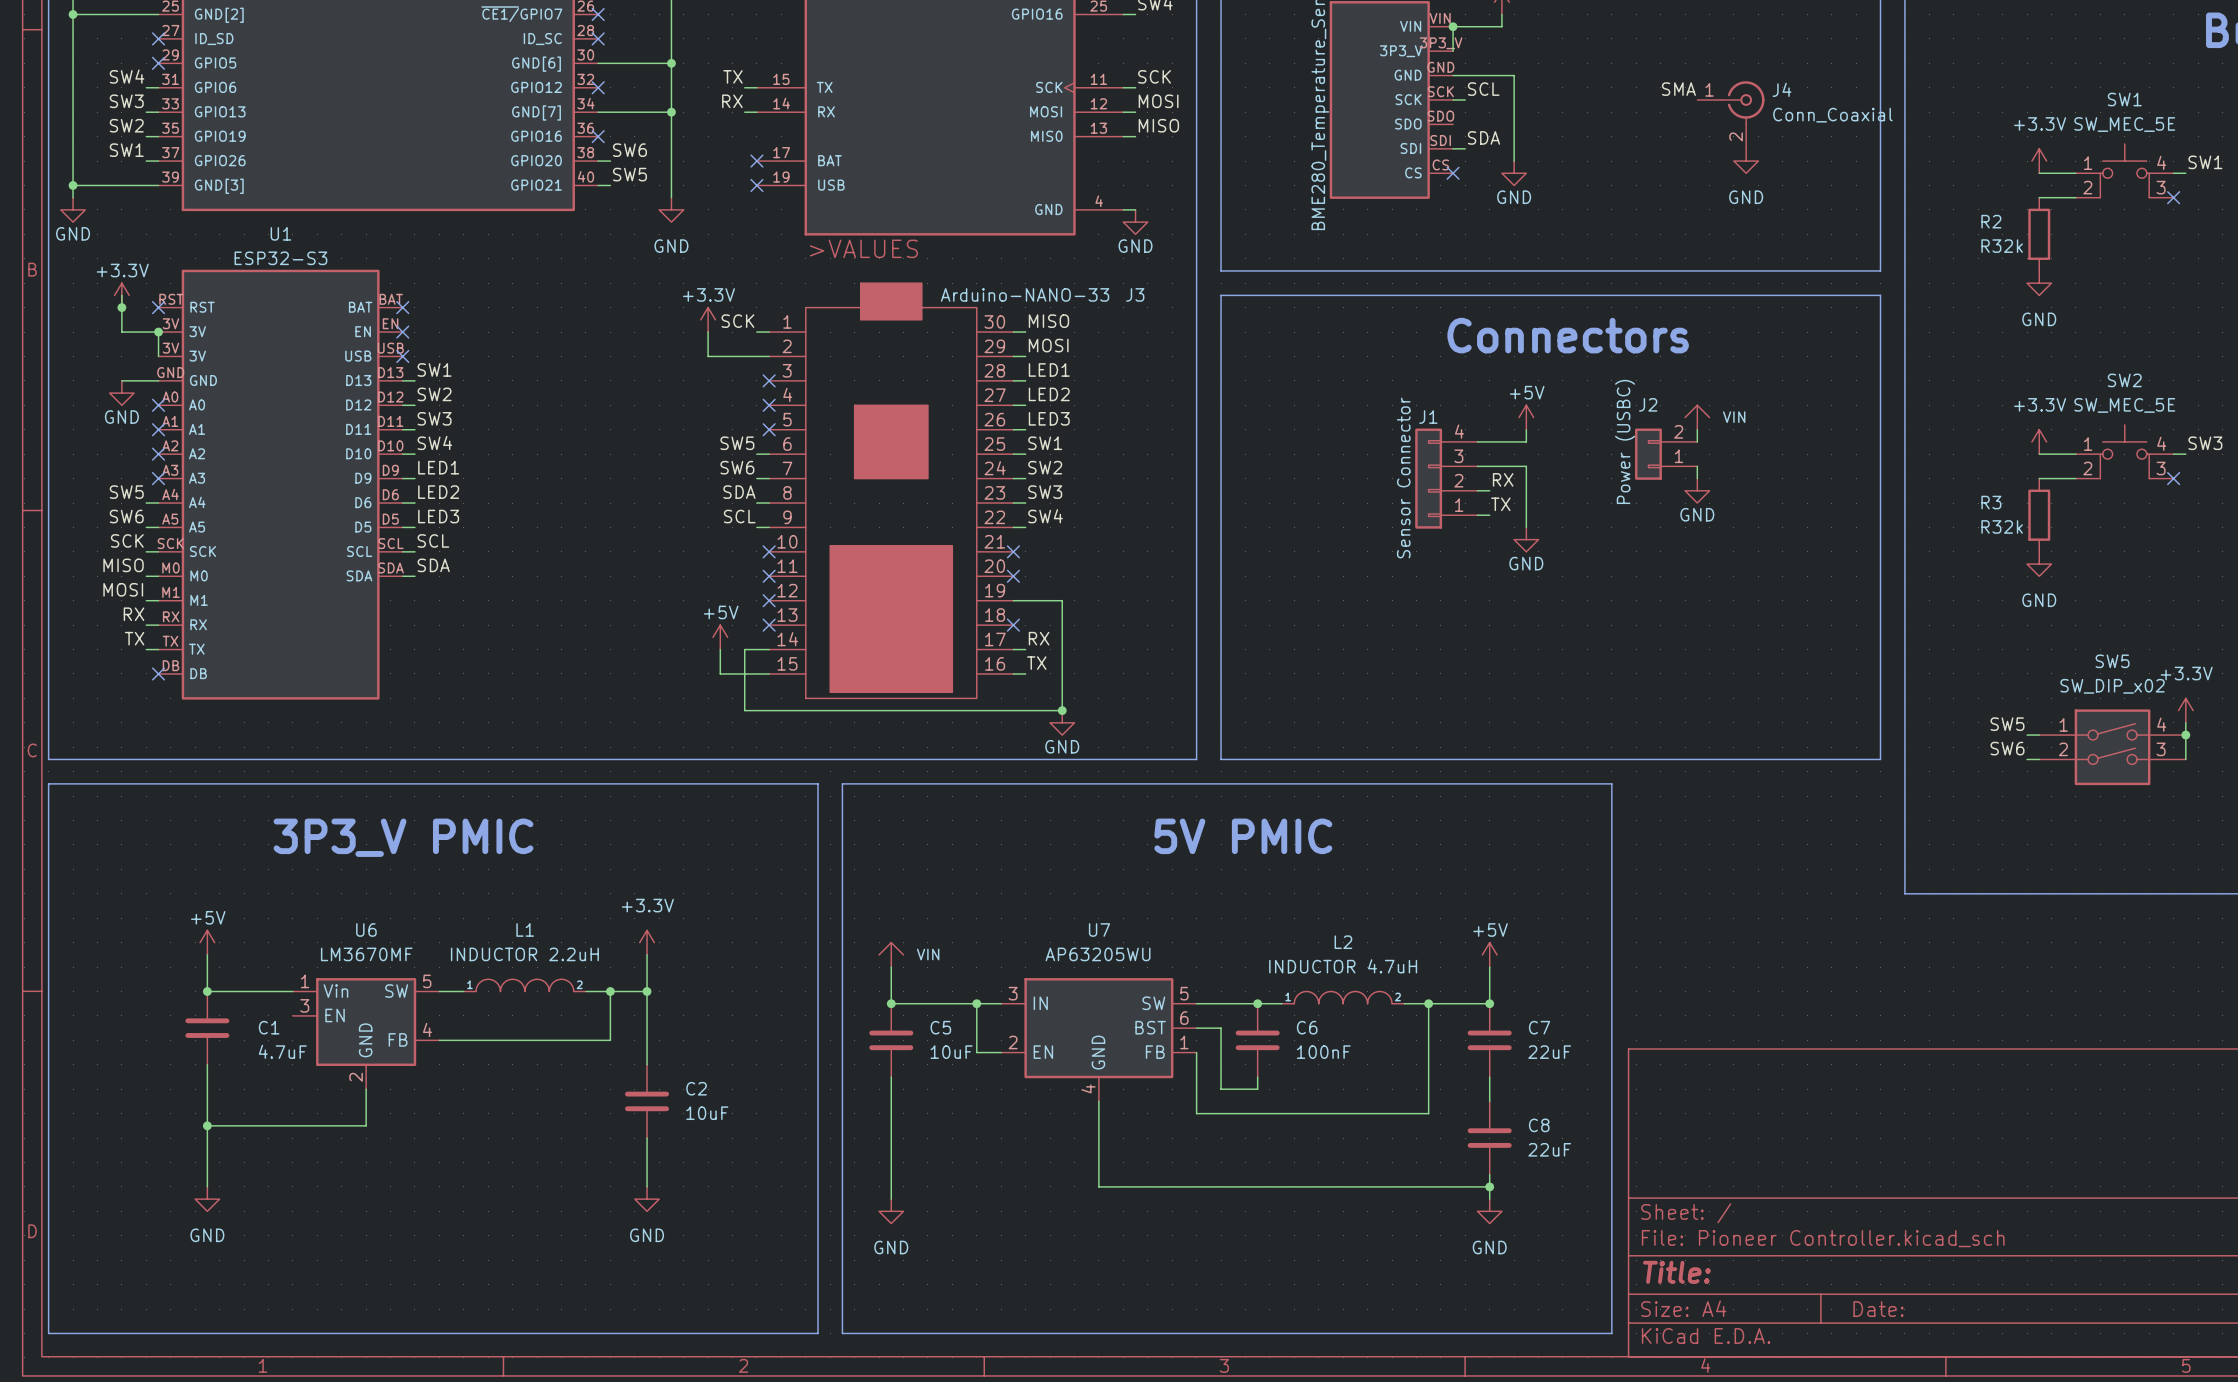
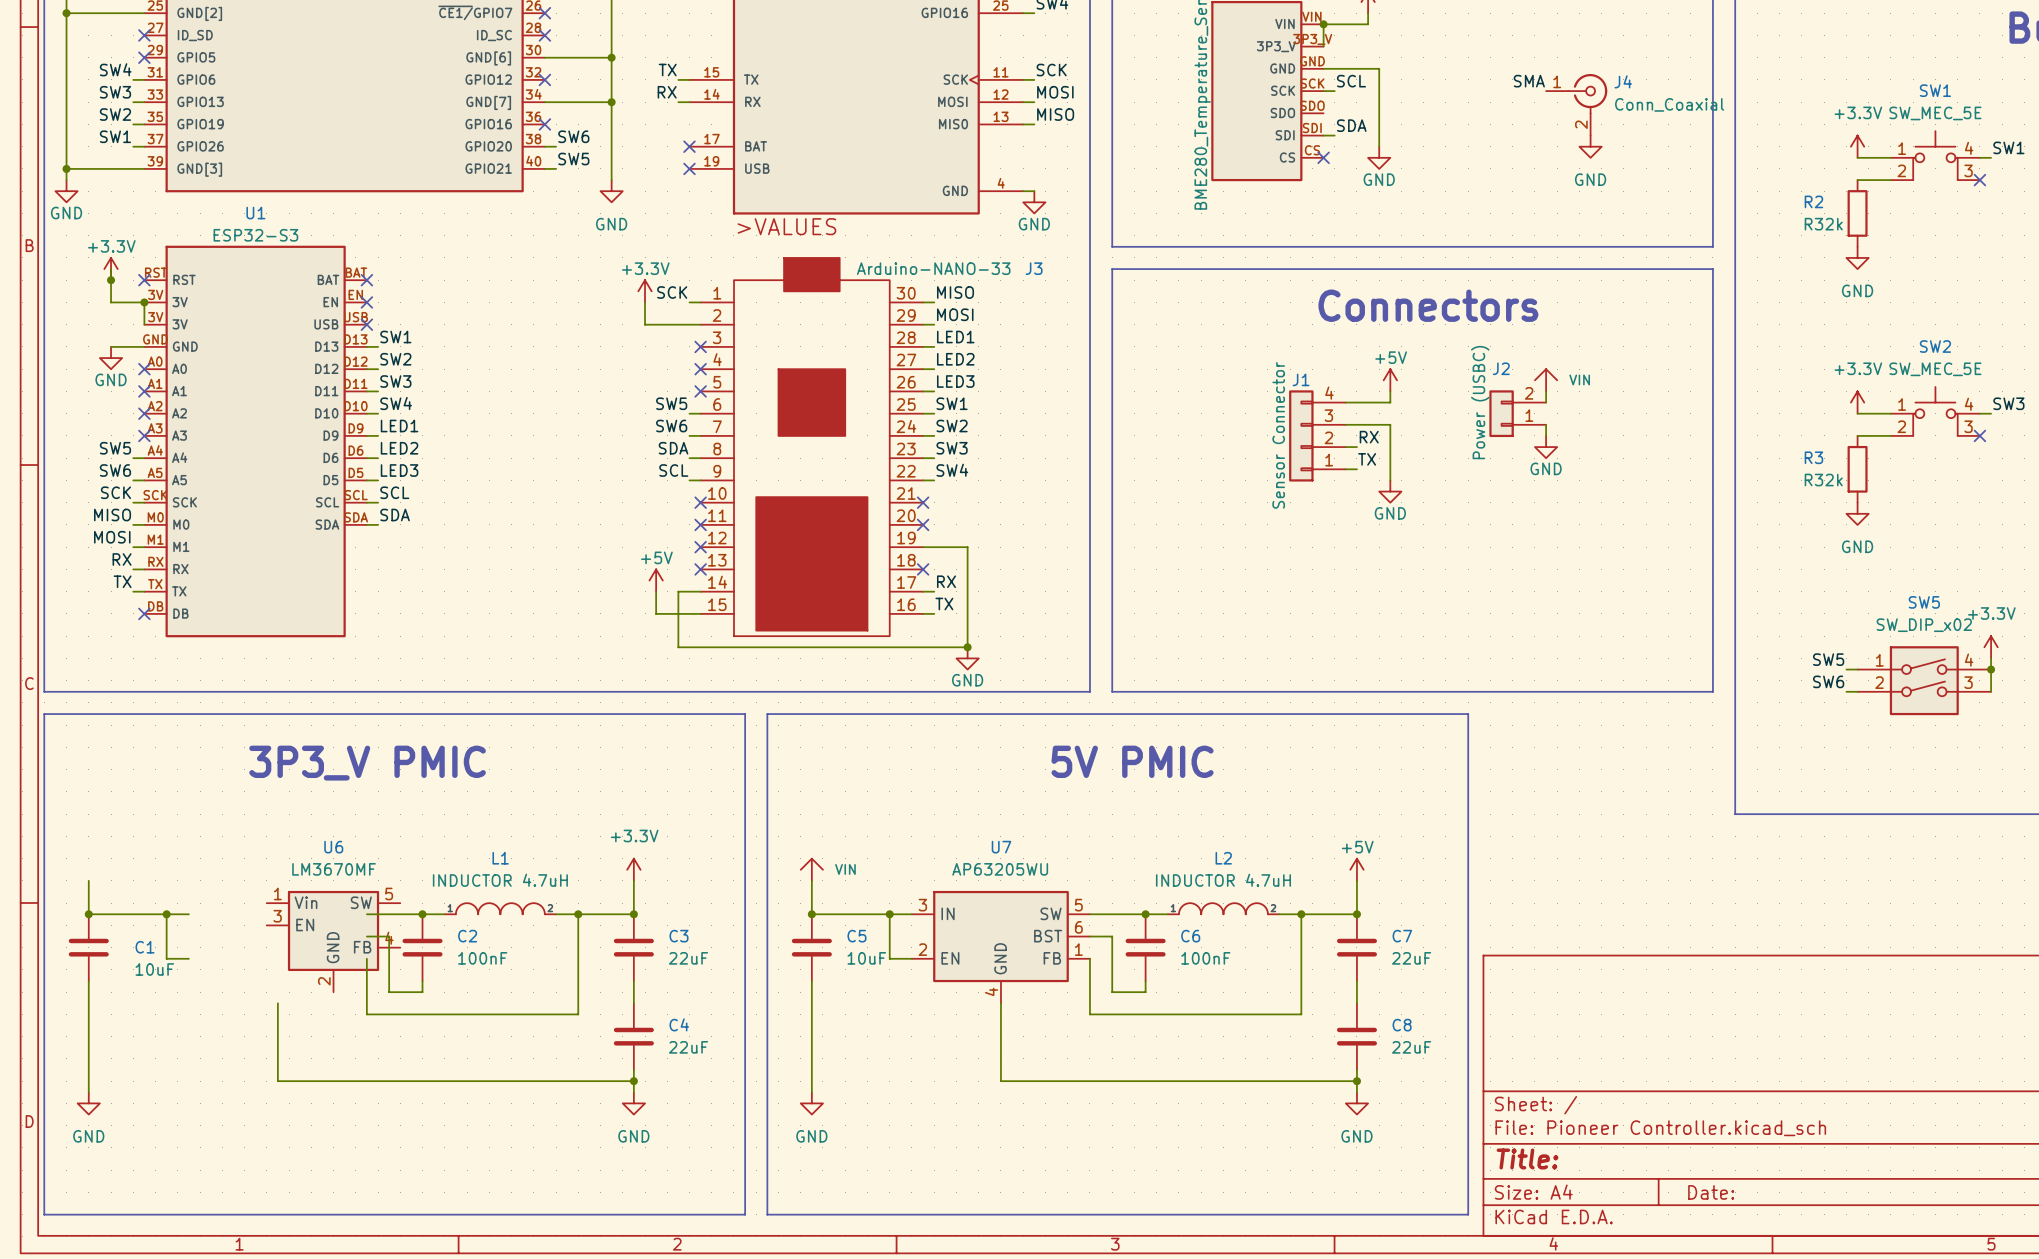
power symbol: +5V (207, 942) -> none
power symbol position: +3.3V (647, 942) -> +3.3V (633, 869)
wire: (207, 954) (207, 991) (292, 991) -> none
L1 value: INDUCTOR 2.2uH (524, 954) -> INDUCTOR 4.7uH (500, 880)
wire: (647, 954) (647, 1064) -> none
wire: none -> (88, 880) (88, 914) (188, 914)
wire: none -> (633, 880) (633, 914) (556, 914)
L1 position: (524, 985) -> (500, 908)
junction position: (207, 991) -> (166, 914)
wire: (439, 991) (463, 991) -> none
wire: (585, 991) (647, 991) -> none
wire: (610, 991) (610, 1040) (439, 1040) -> none
junction: (610, 991) -> none
junction: (647, 991) -> none
junction: none -> (88, 914)
wire: none -> (166, 914) (166, 958) (188, 958)
wire: none -> (366, 914) (444, 914)
junction: none -> (422, 914)
wire: none -> (578, 914) (578, 1014) (366, 1014) (366, 958)
junction: none -> (578, 914)
junction: none -> (633, 914)
C1 position: (207, 1028) -> (88, 947)
wire: none -> (366, 936) (389, 936) (389, 992) (422, 992) (422, 981)
C3: none -> 22uF (633, 947)
C1 value: 4.7uF (282, 1051) -> 10uF (154, 969)
wire: (207, 1064) (207, 1186) -> (88, 981) (88, 1092)
wire: none -> (633, 981) (633, 1003)
wire: (366, 1089) (366, 1125) (207, 1125) -> none
wire: none -> (277, 1003) (277, 1081) (633, 1081)
C2 position: (647, 1101) -> (422, 947)
C2 value: 10uF (707, 1113) -> 100nF (482, 958)
junction: (207, 1125) -> none
wire: (647, 1138) (647, 1186) -> none
C4: none -> 22uF (633, 1036)
wire: none -> (633, 1070) (633, 1092)
junction: none -> (633, 1081)
power symbol position: GND (207, 1199) -> GND (88, 1103)
power symbol position: GND (647, 1199) -> GND (633, 1103)

